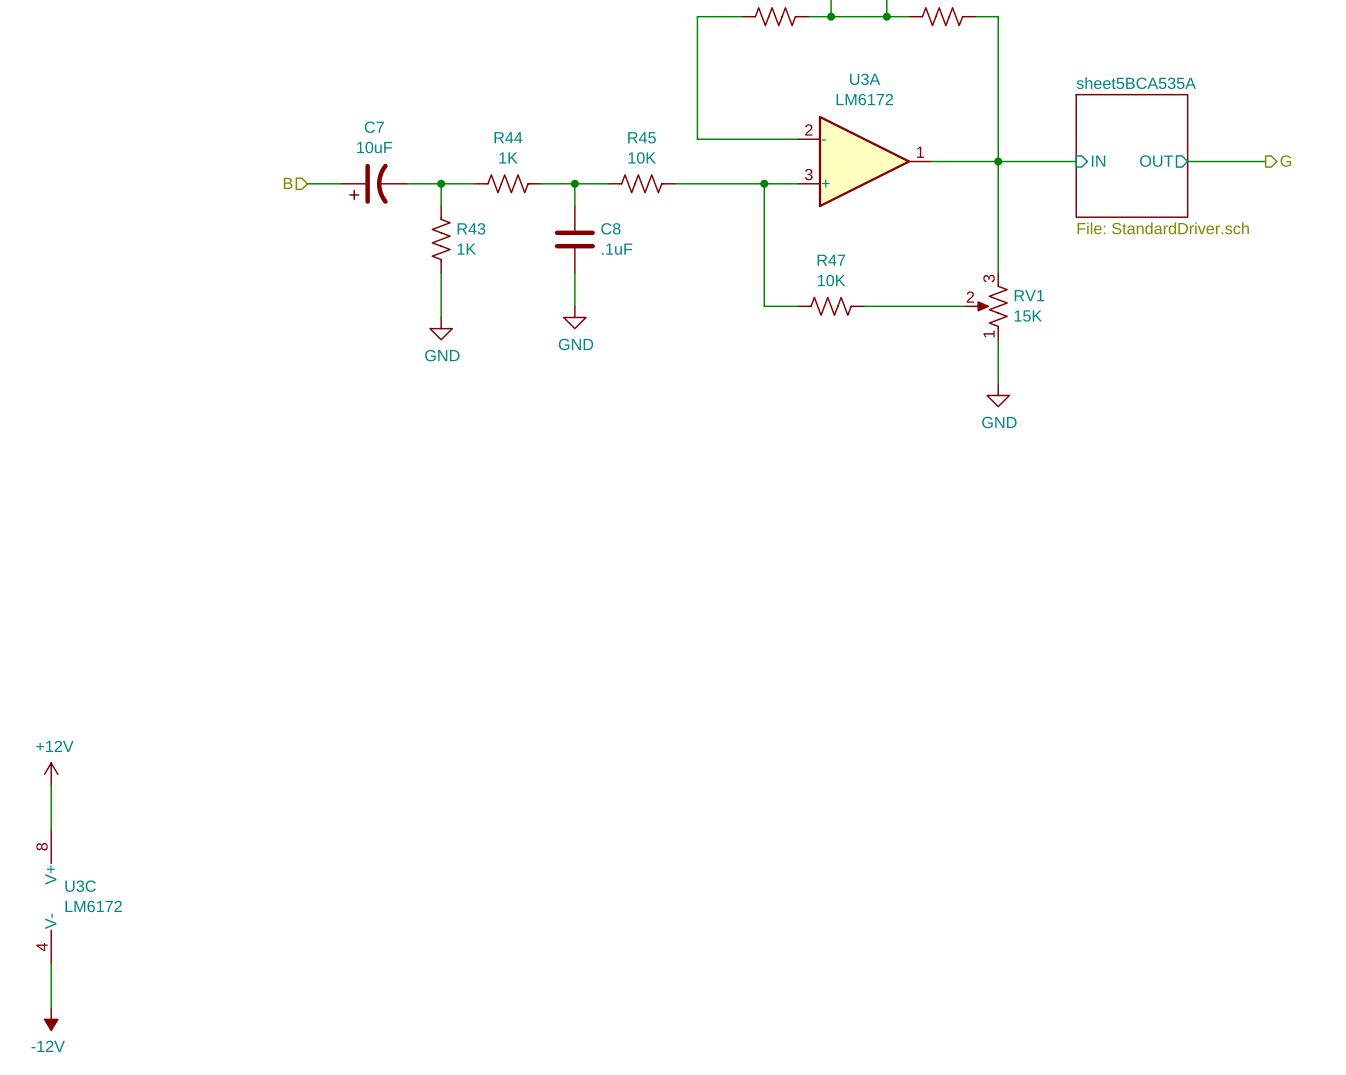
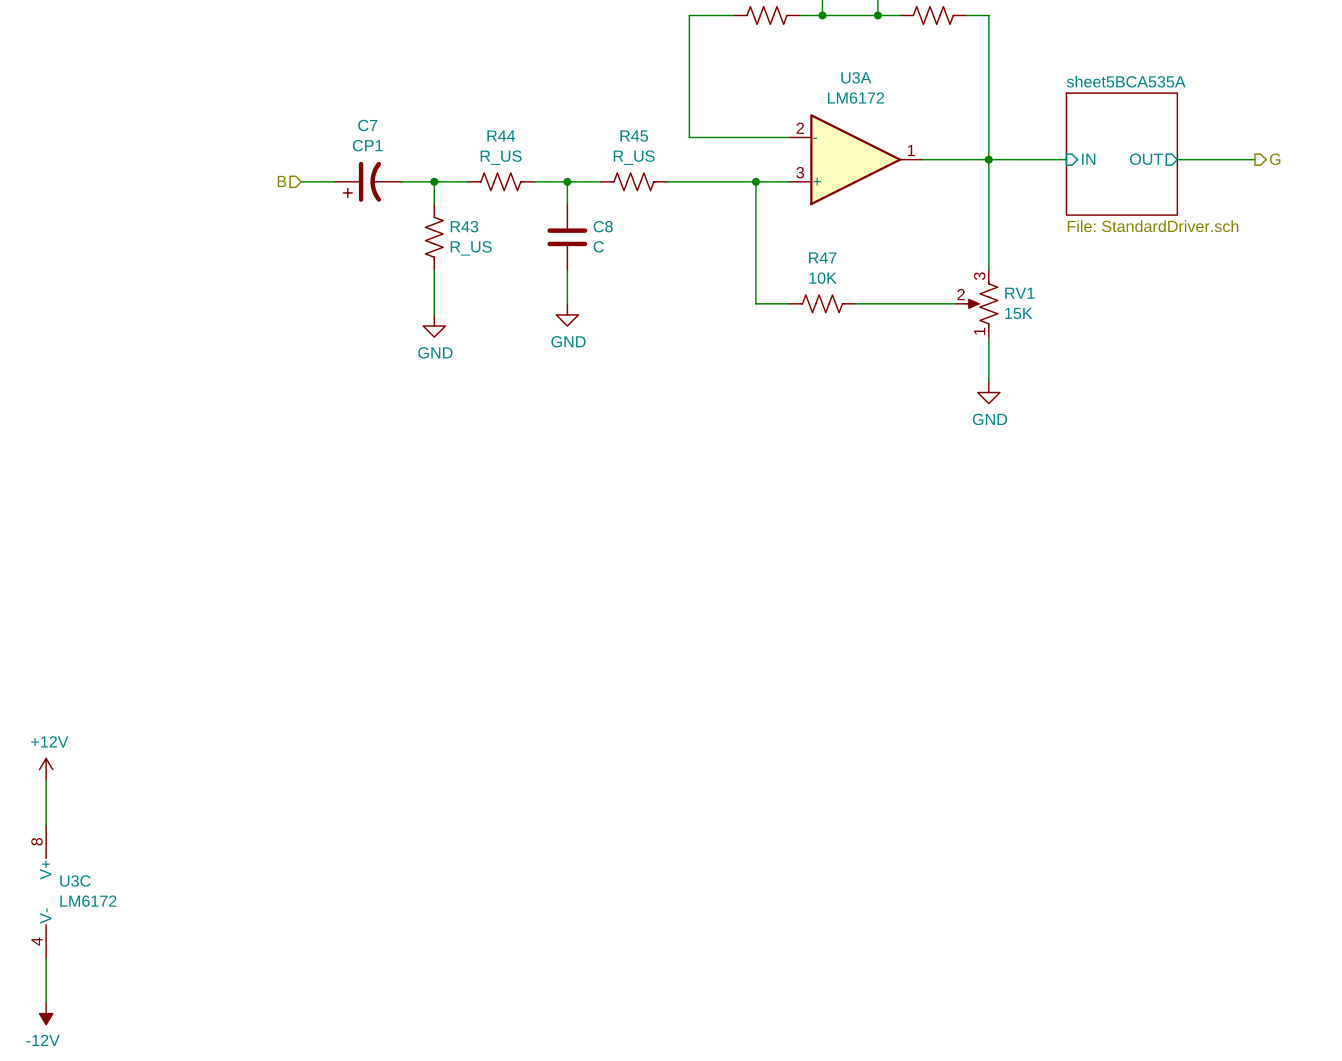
C7 value: 10uF (374, 147) -> CP1 (367, 145)
R44 value: 1K (508, 157) -> R_US (501, 157)
R45 value: 10K (642, 157) -> R_US (634, 157)
R43 value: 1K (466, 249) -> R_US (471, 248)
C8 value: .1uF (617, 249) -> C (598, 246)

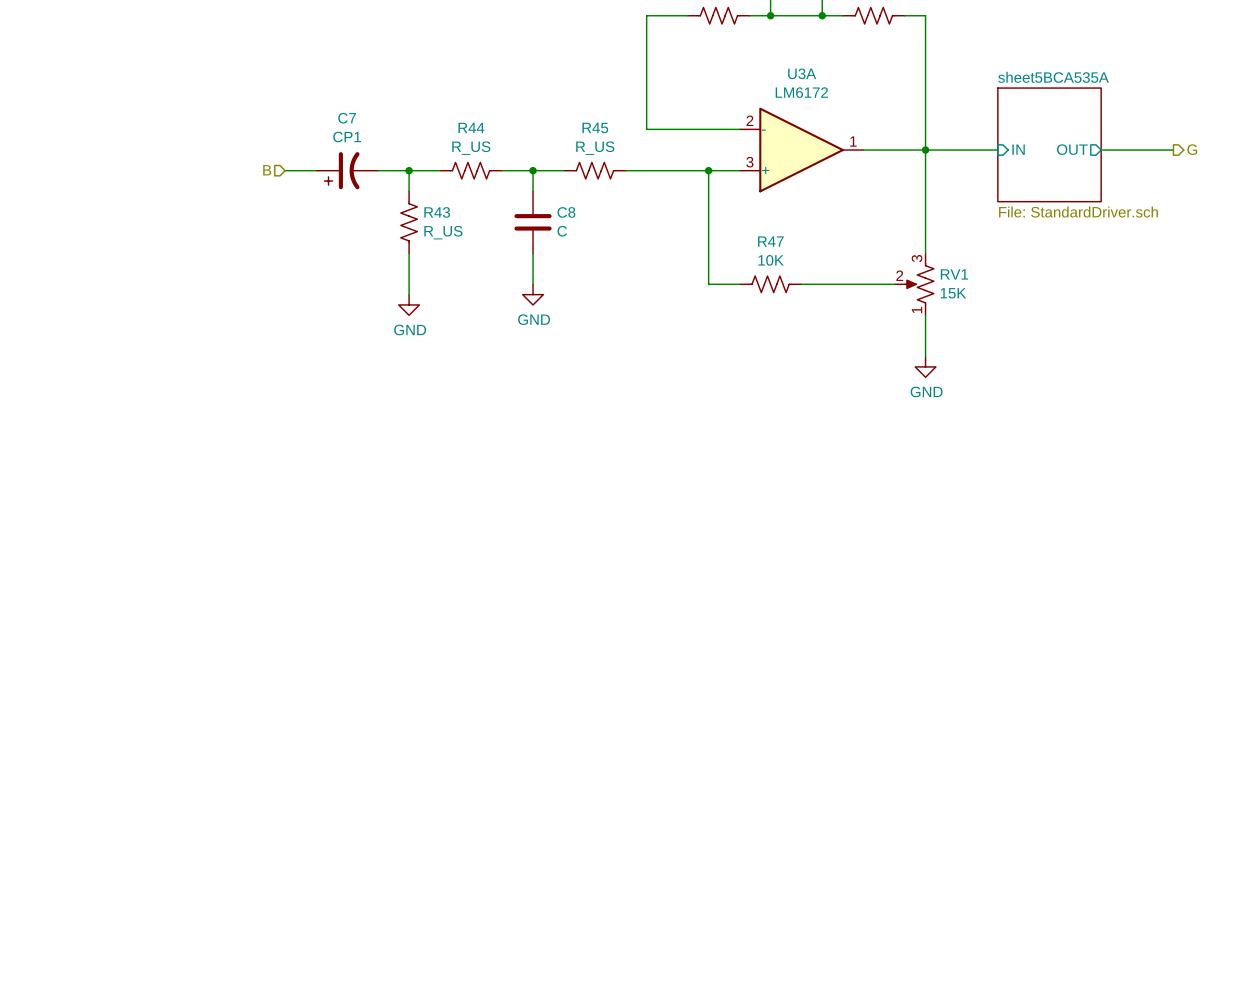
power symbol: +12V (46, 769) -> none
wire: (46, 780) (46, 825) -> none
U3C: LM6172 (46, 891) -> none
wire: (46, 958) (46, 1002) -> none
power symbol: -12V (46, 1013) -> none

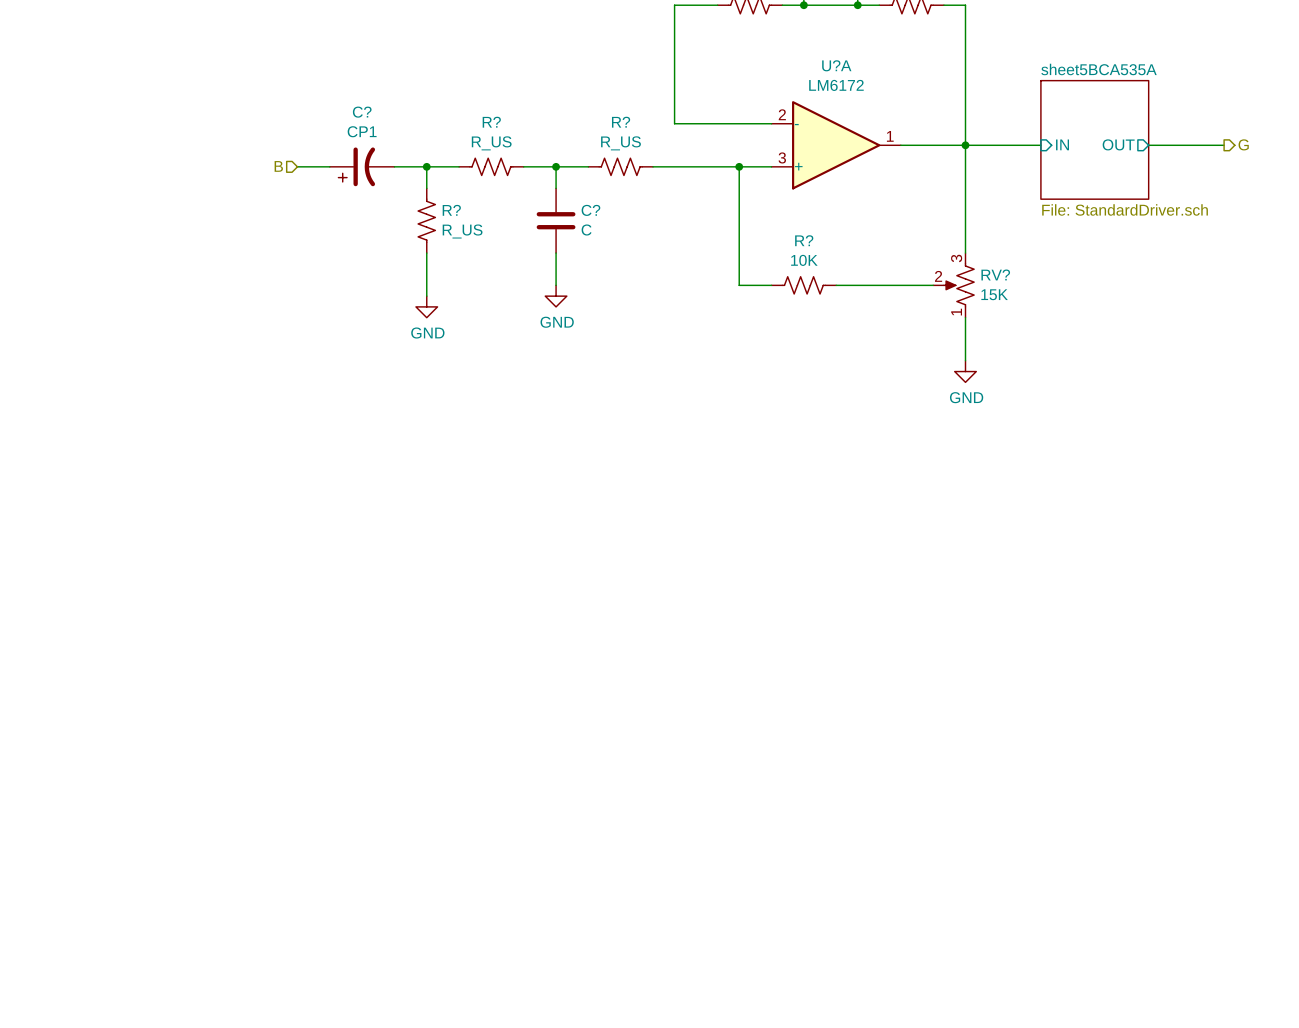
U3A name: U3A (802, 73) -> U?A (836, 65)
C7 name: C7 (347, 118) -> C? (362, 112)
R44 name: R44 (471, 127) -> R? (491, 122)
R45 name: R45 (595, 128) -> R? (621, 122)
R43 name: R43 (437, 212) -> R? (451, 210)
C8 name: C8 (566, 212) -> C? (590, 210)
R47 name: R47 (770, 241) -> R? (804, 240)
RV1 name: RV1 (954, 274) -> RV? (995, 274)

